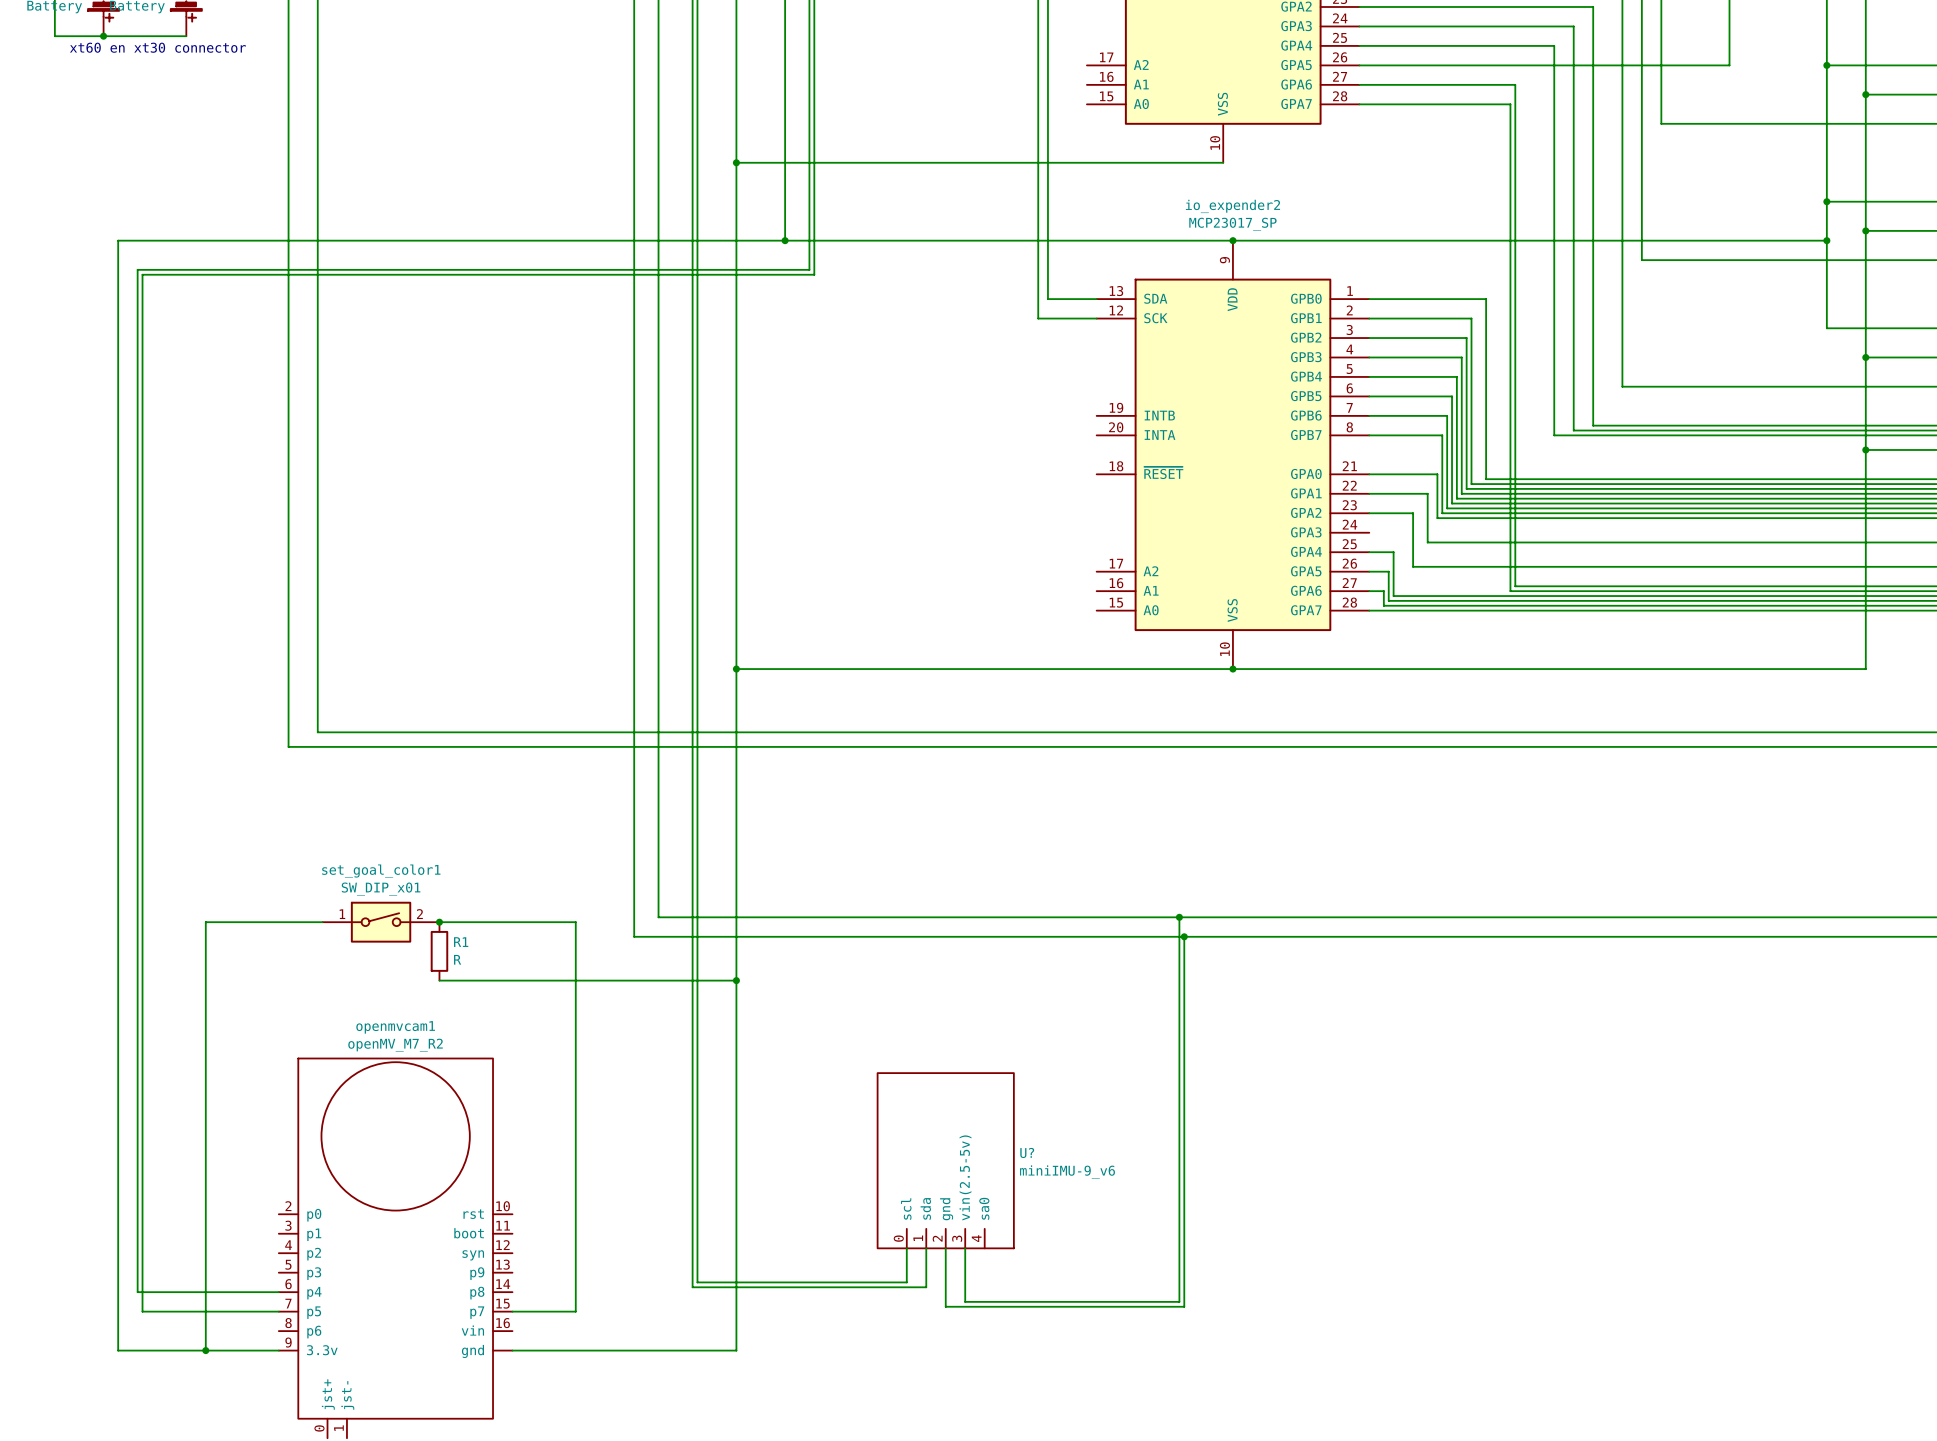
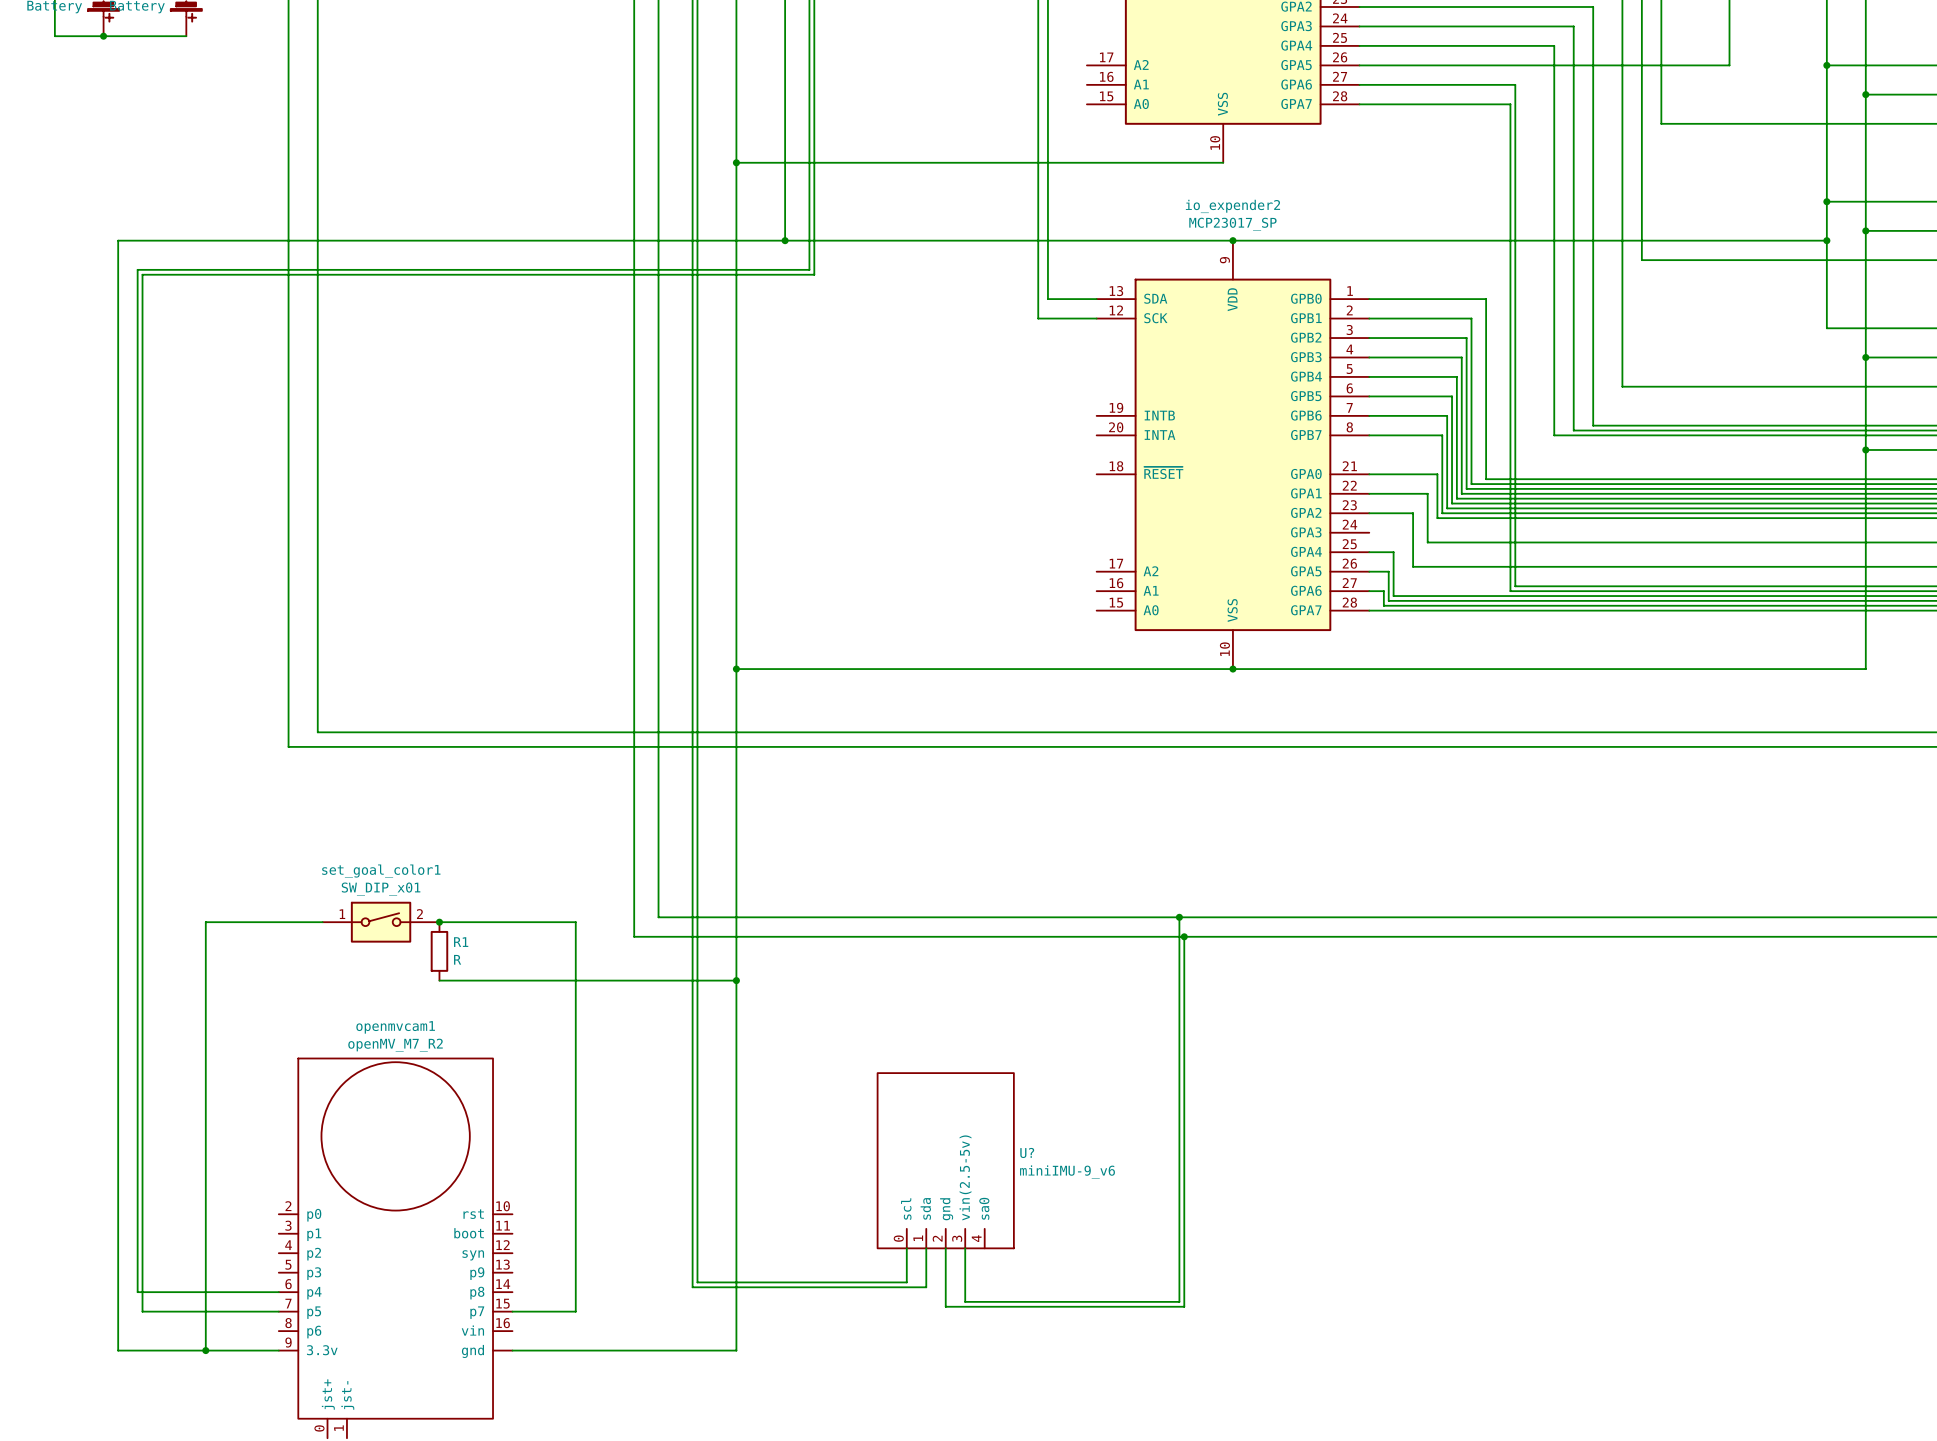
text: xt60 en xt30 connector (157, 47) -> none

